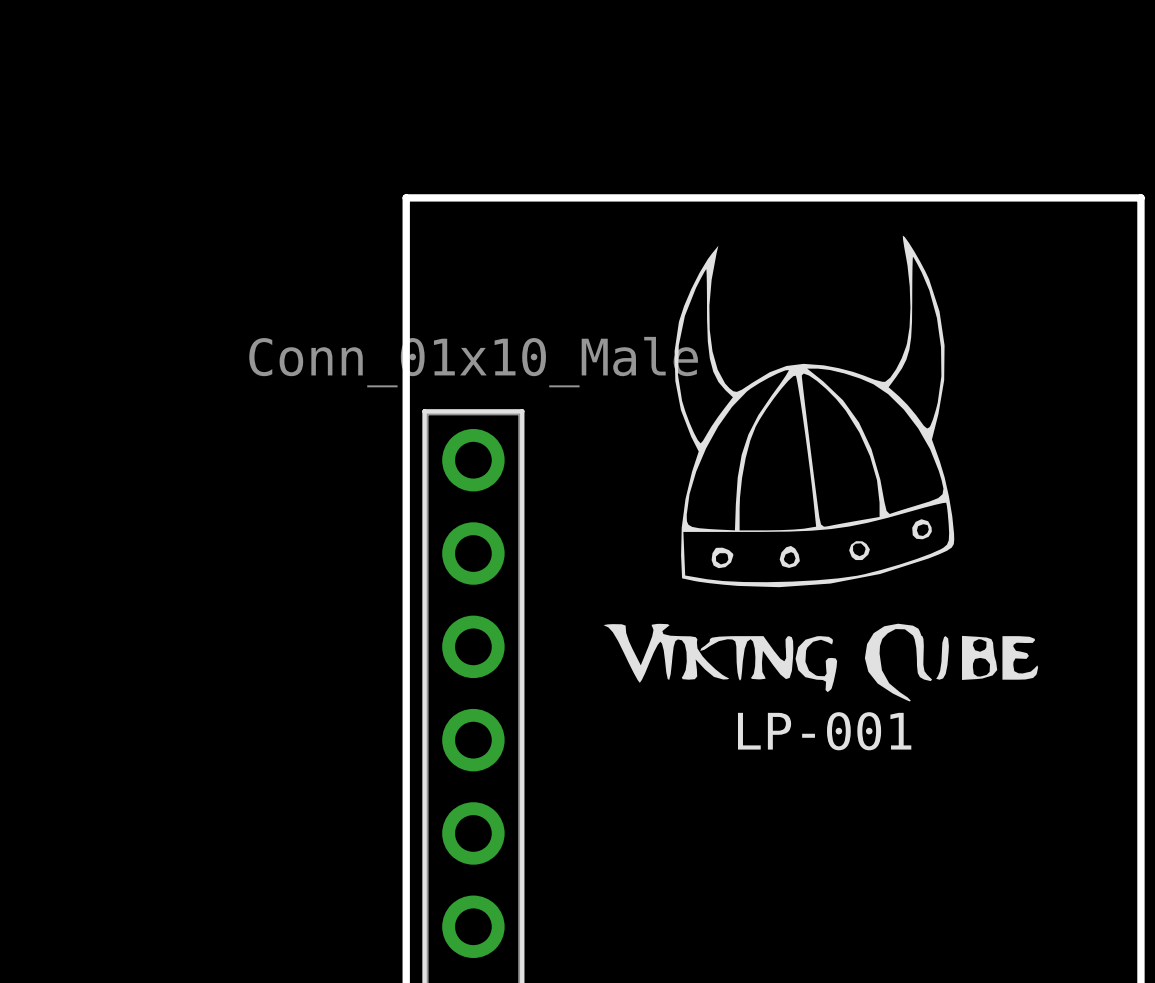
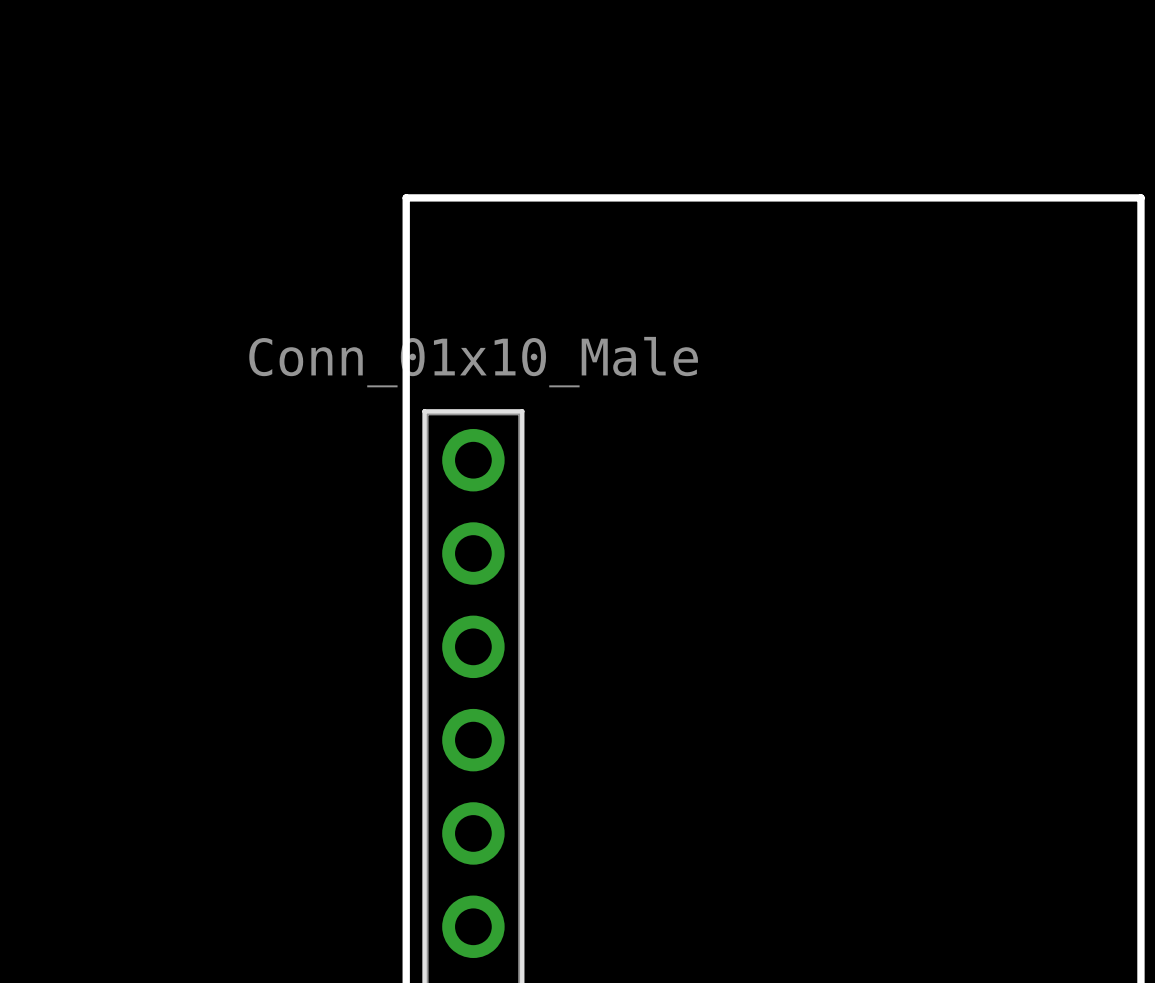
drawing: [603, 235, 1039, 702] -> none
text: LP-001 (824, 731) -> none

